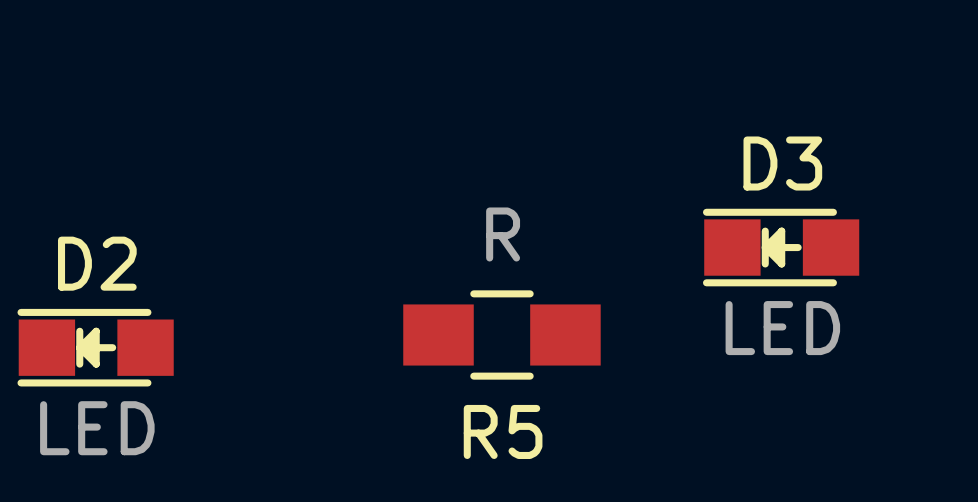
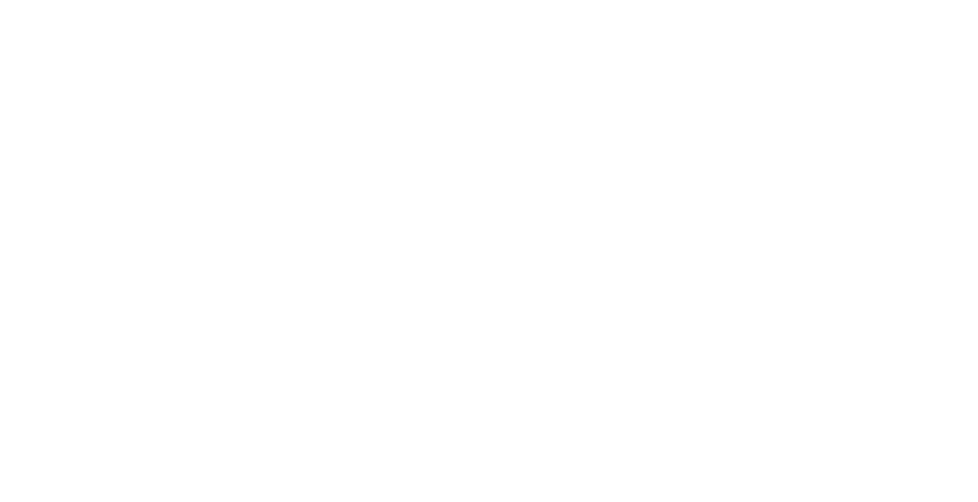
D3: LED (781, 247) -> none
R5: R (501, 334) -> none
D2: LED (95, 347) -> none

